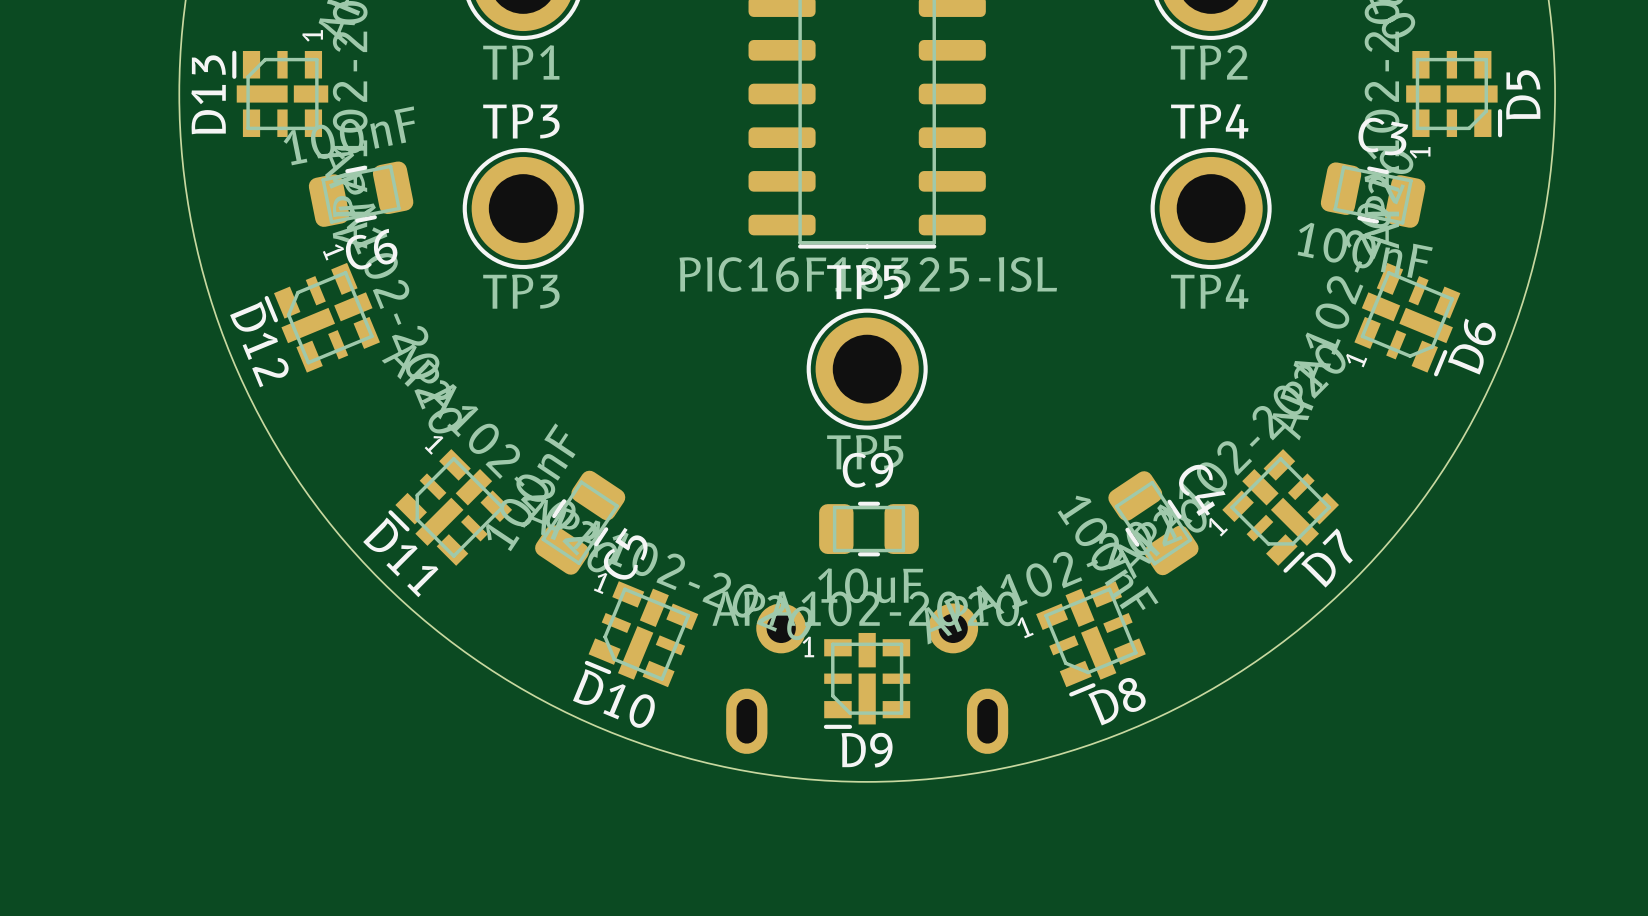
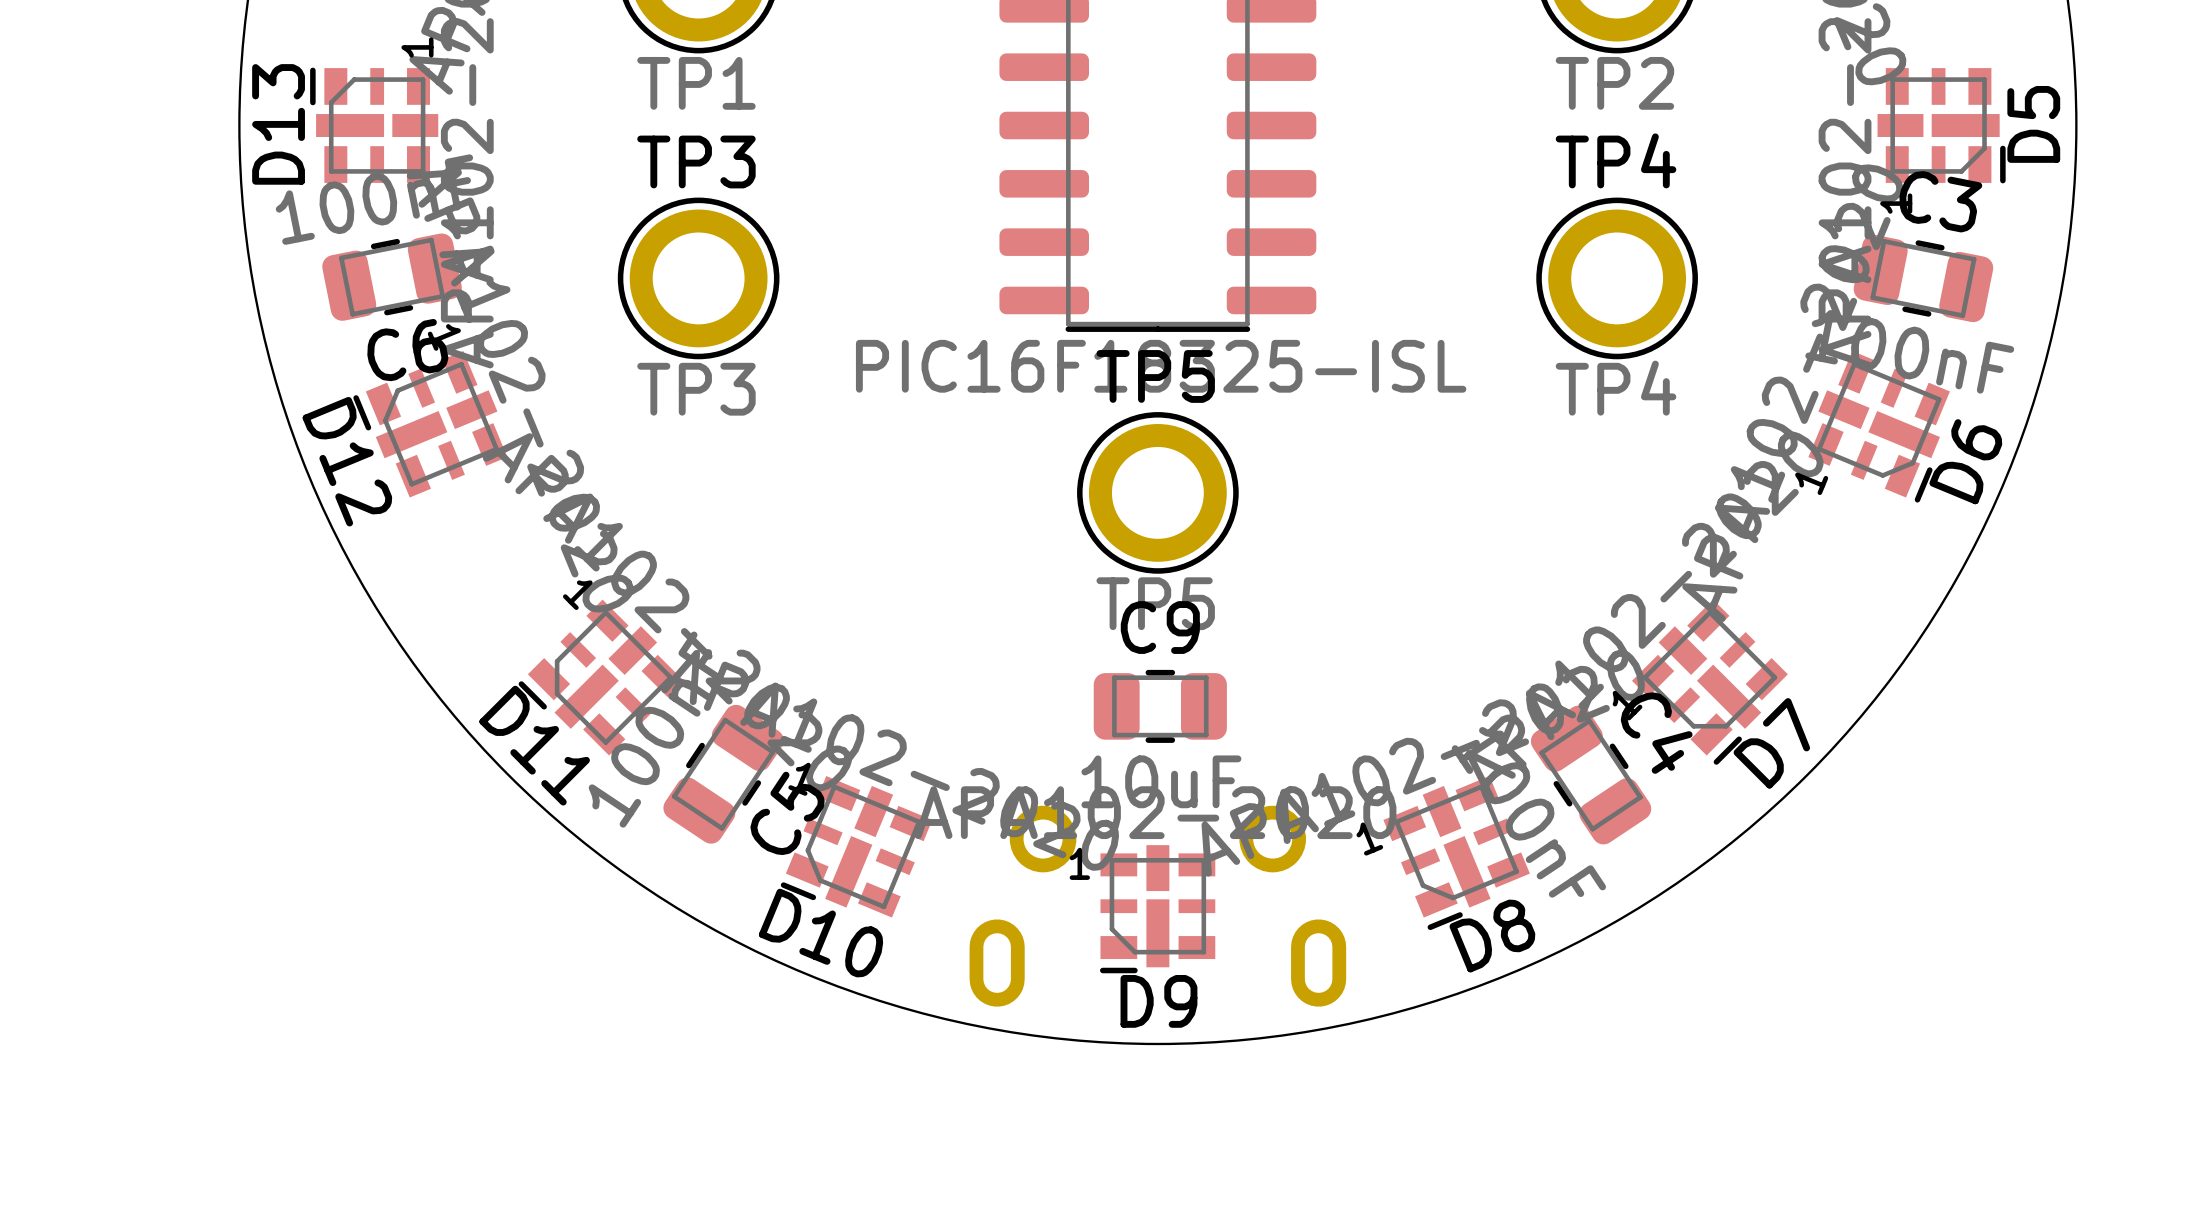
C6 position: (361, 194) -> (392, 277)
C3 position: (1373, 195) -> (1923, 278)
C5 position: (580, 522) -> (723, 774)
C4 position: (1153, 523) -> (1591, 775)

